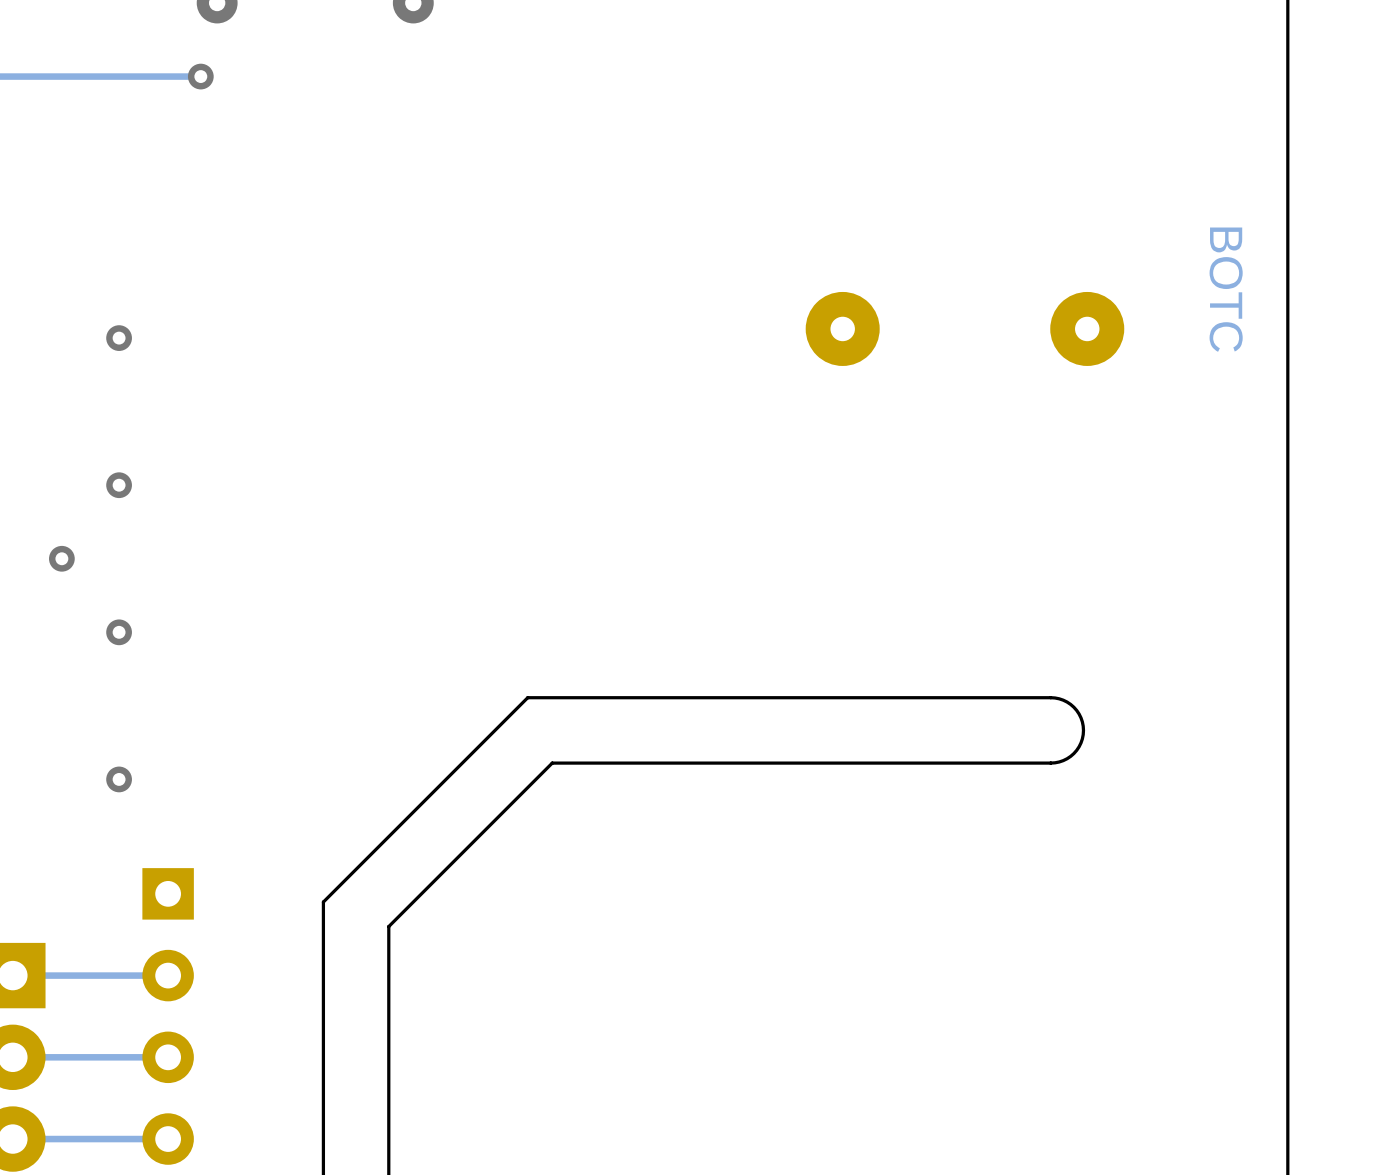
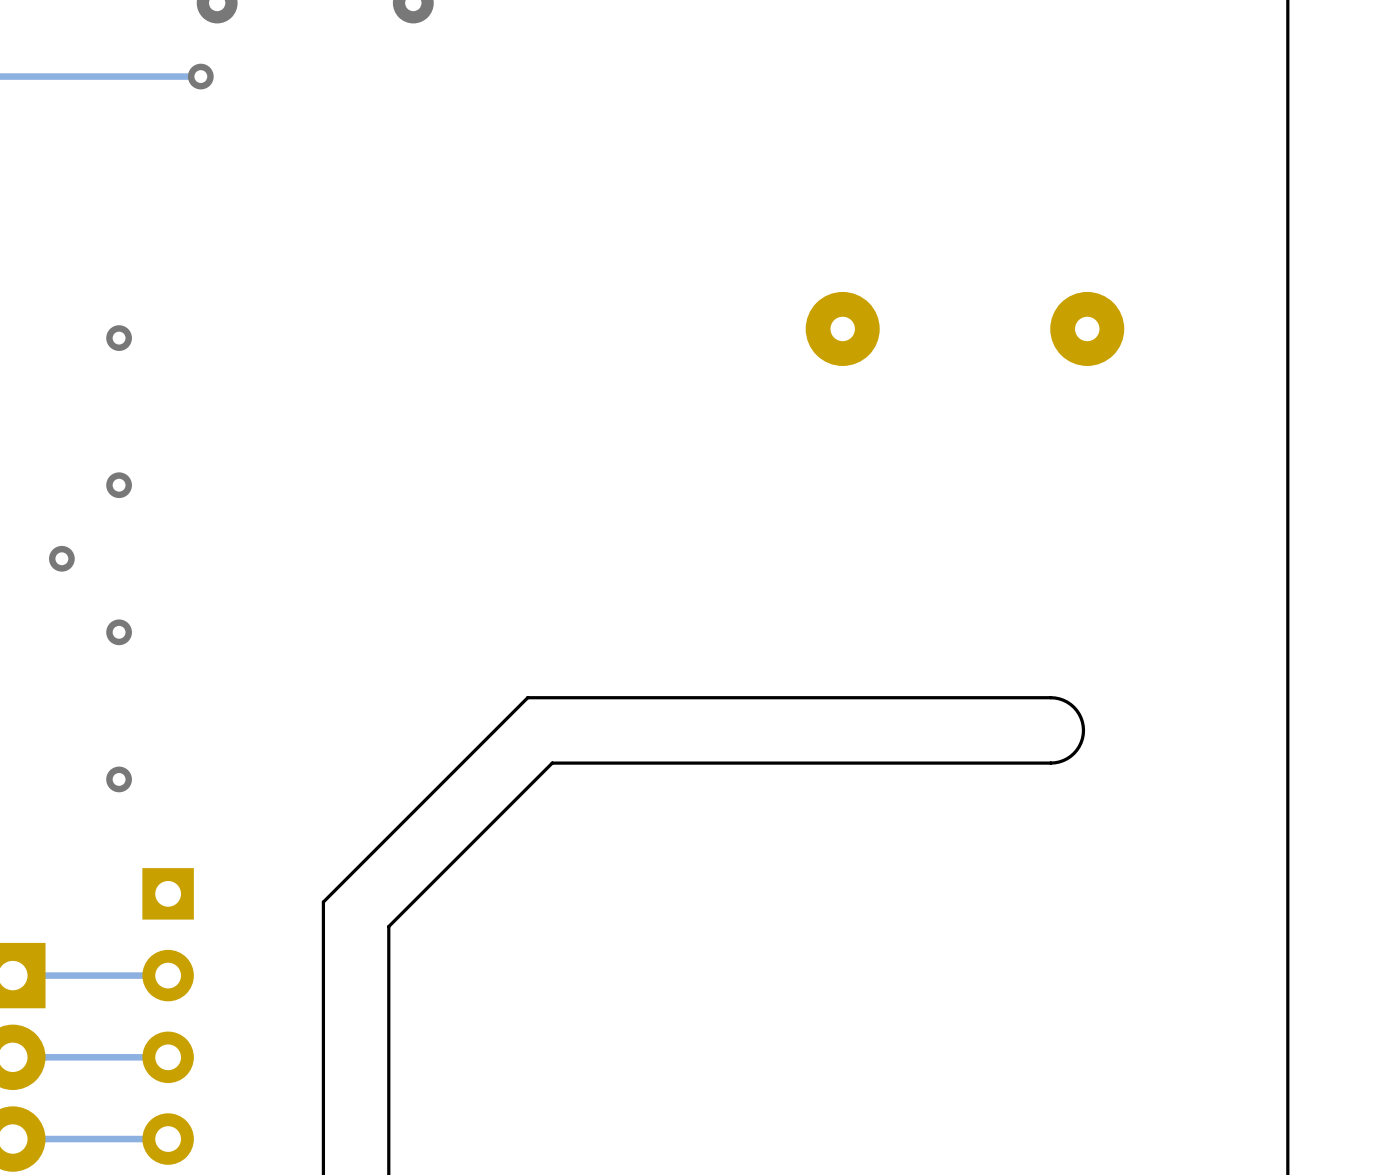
text: BOTC (1226, 289) -> none

